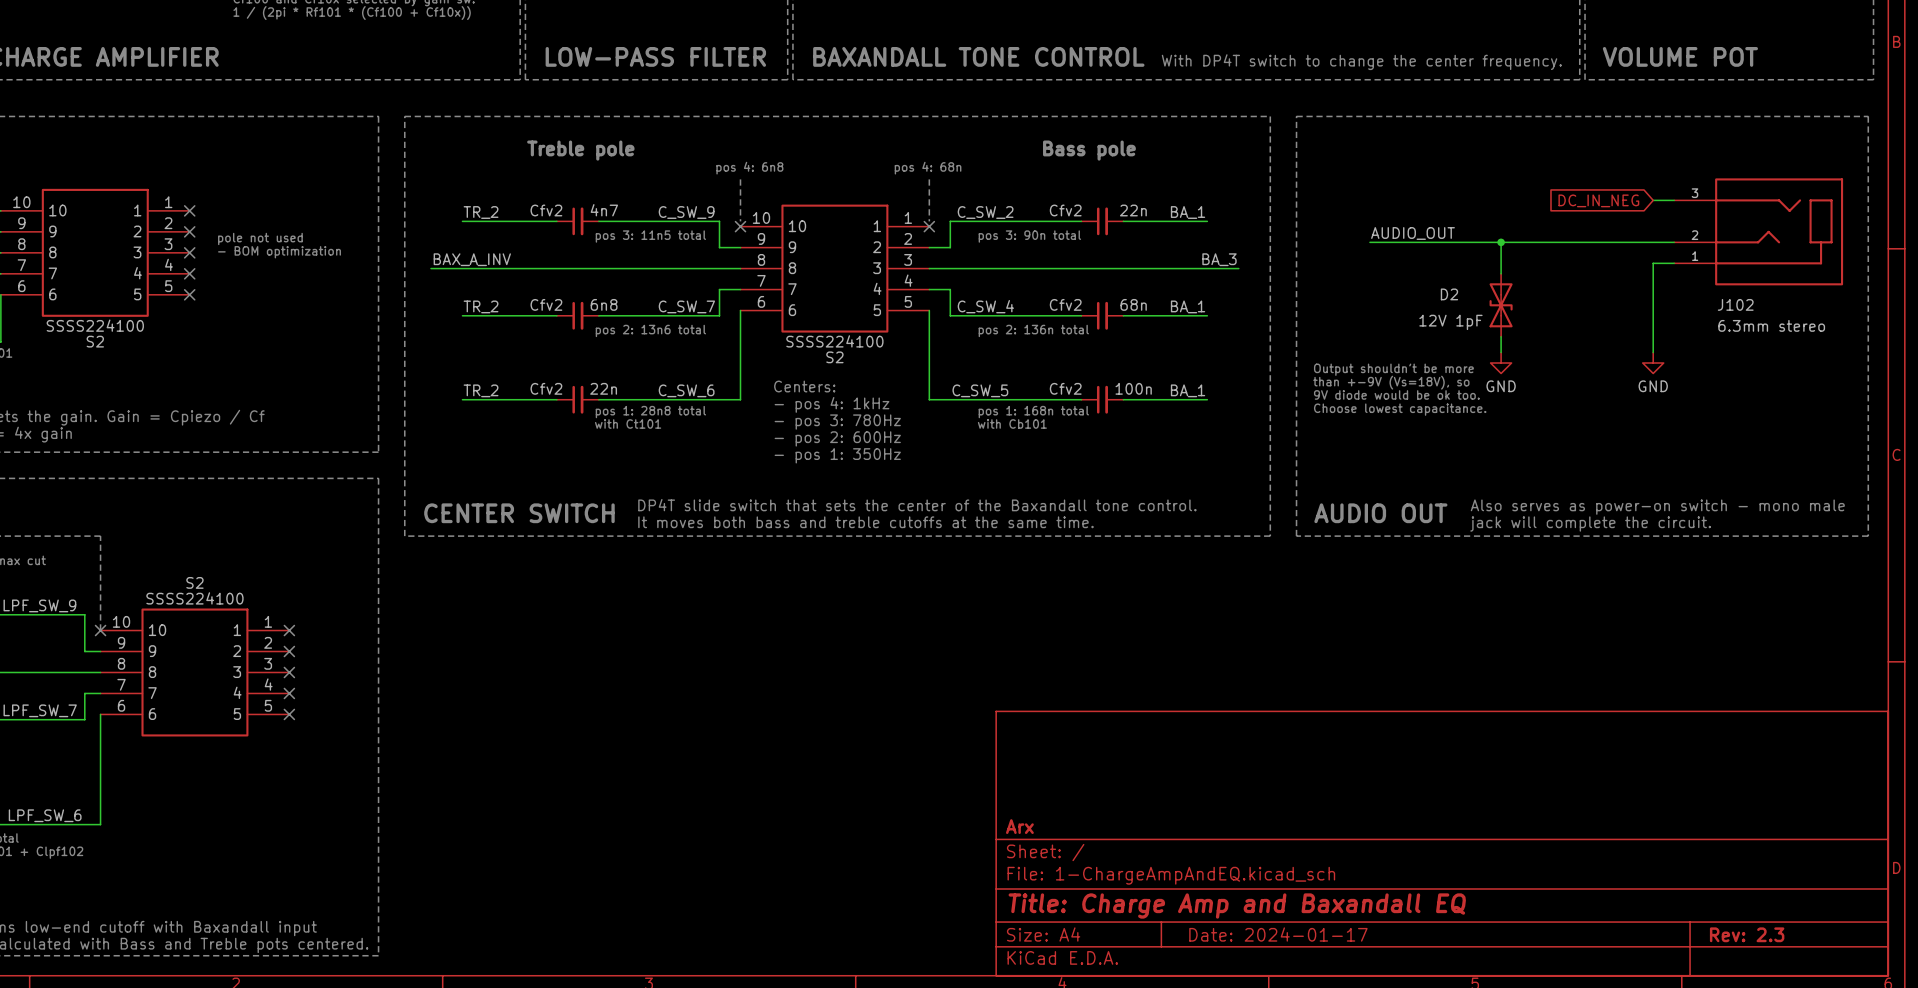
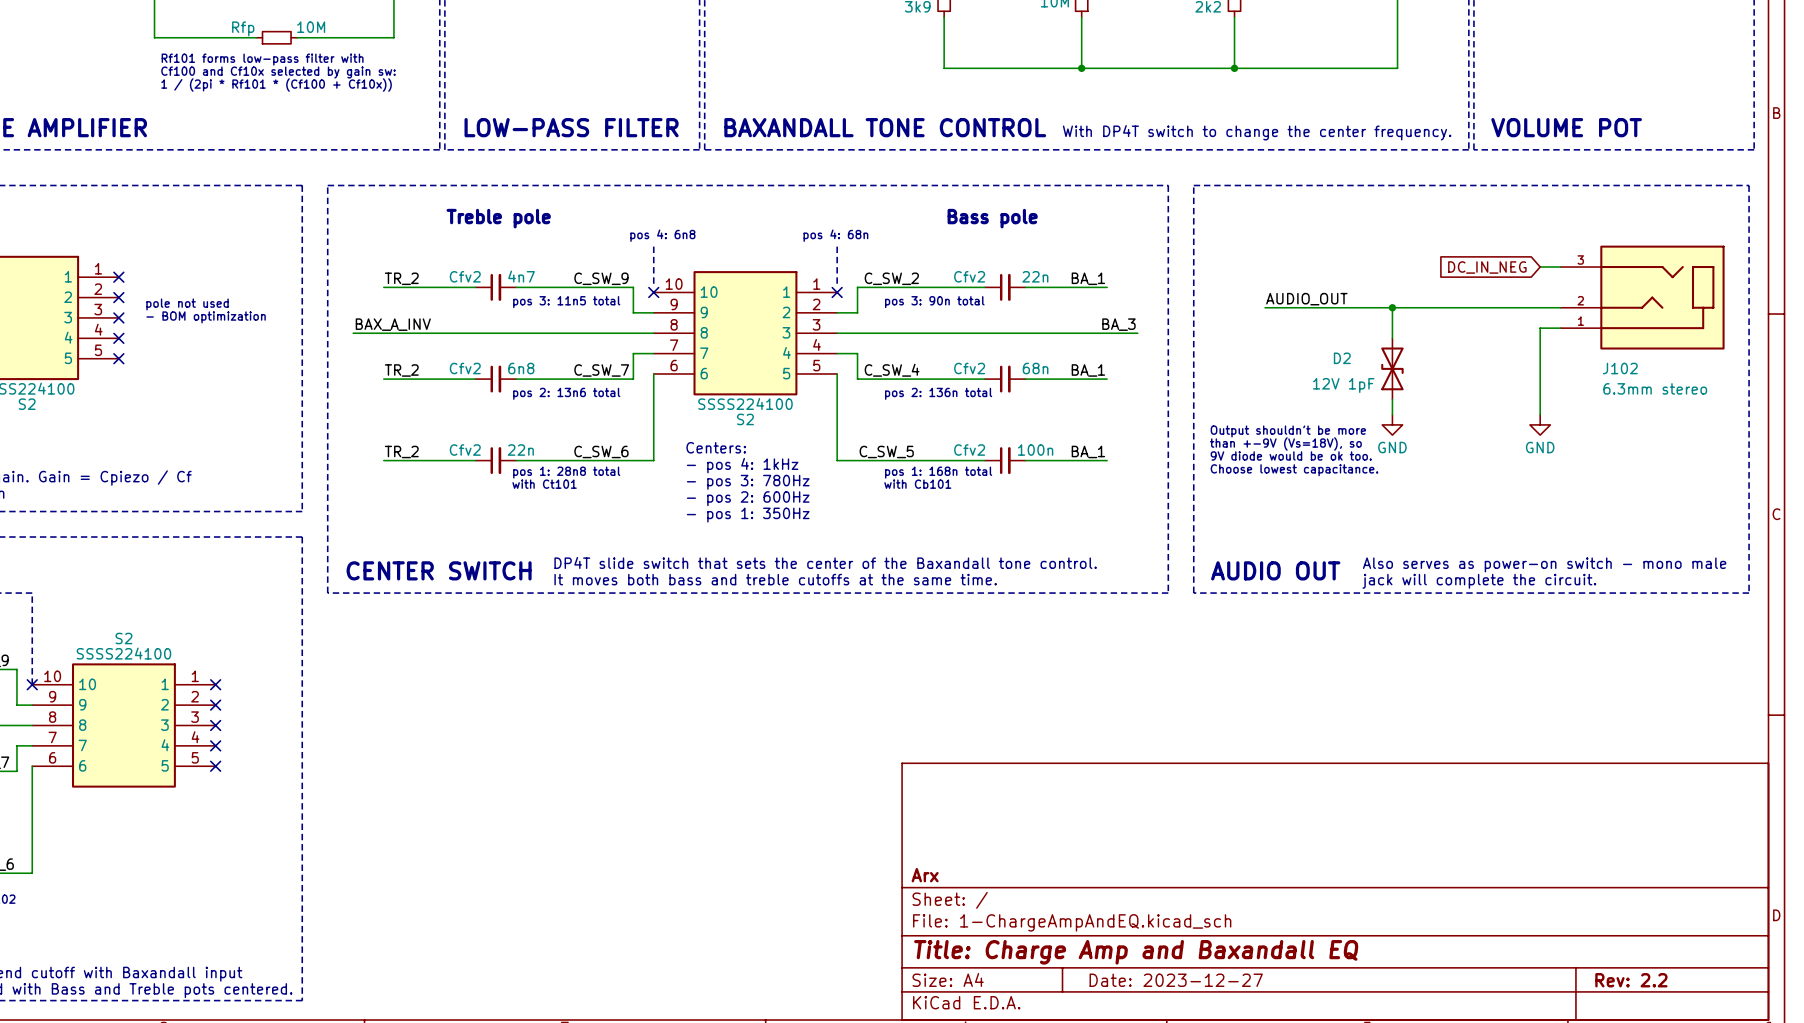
title block: Date: 2024-01-17 (1278, 934) -> Date: 2023-12-27 (1176, 980)
title block: Rev: 2.3 (1747, 934) -> Rev: 2.2 (1631, 980)

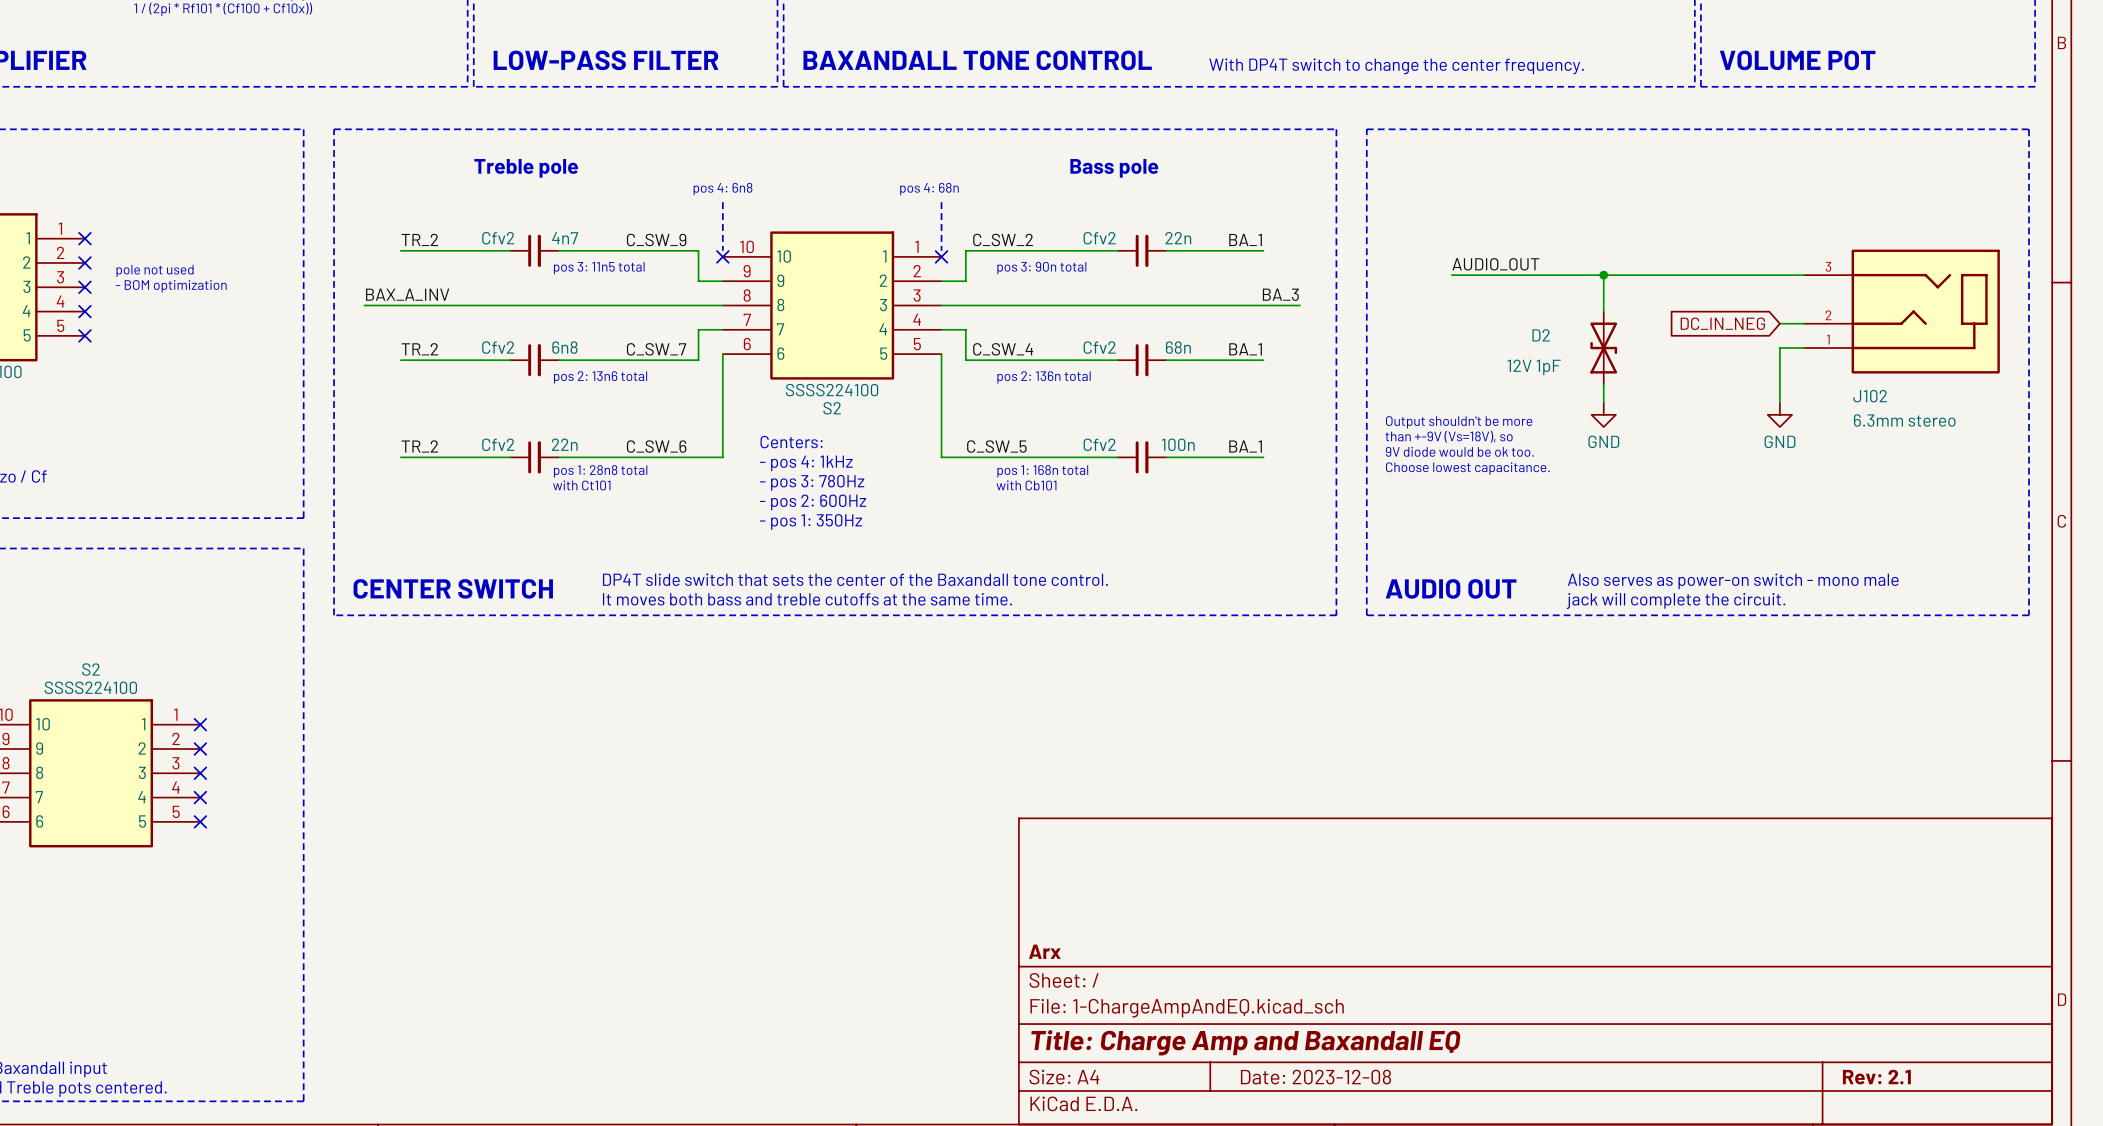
global label position: DC_IN_NEG (1487, 267) -> DC_IN_NEG (1722, 323)
wire: (1540, 267) (1560, 267) -> (1779, 323) (1804, 323)
J102 position: (1642, 297) -> (1902, 311)
wire: (1560, 328) (1540, 328) (1540, 368) -> (1804, 348) (1779, 348)
title block: Date: 2023-12-27 (1176, 980) -> Date: 2023-12-08 (1315, 1077)
title block: Rev: 2.2 (1631, 980) -> Rev: 2.1 (1876, 1077)

